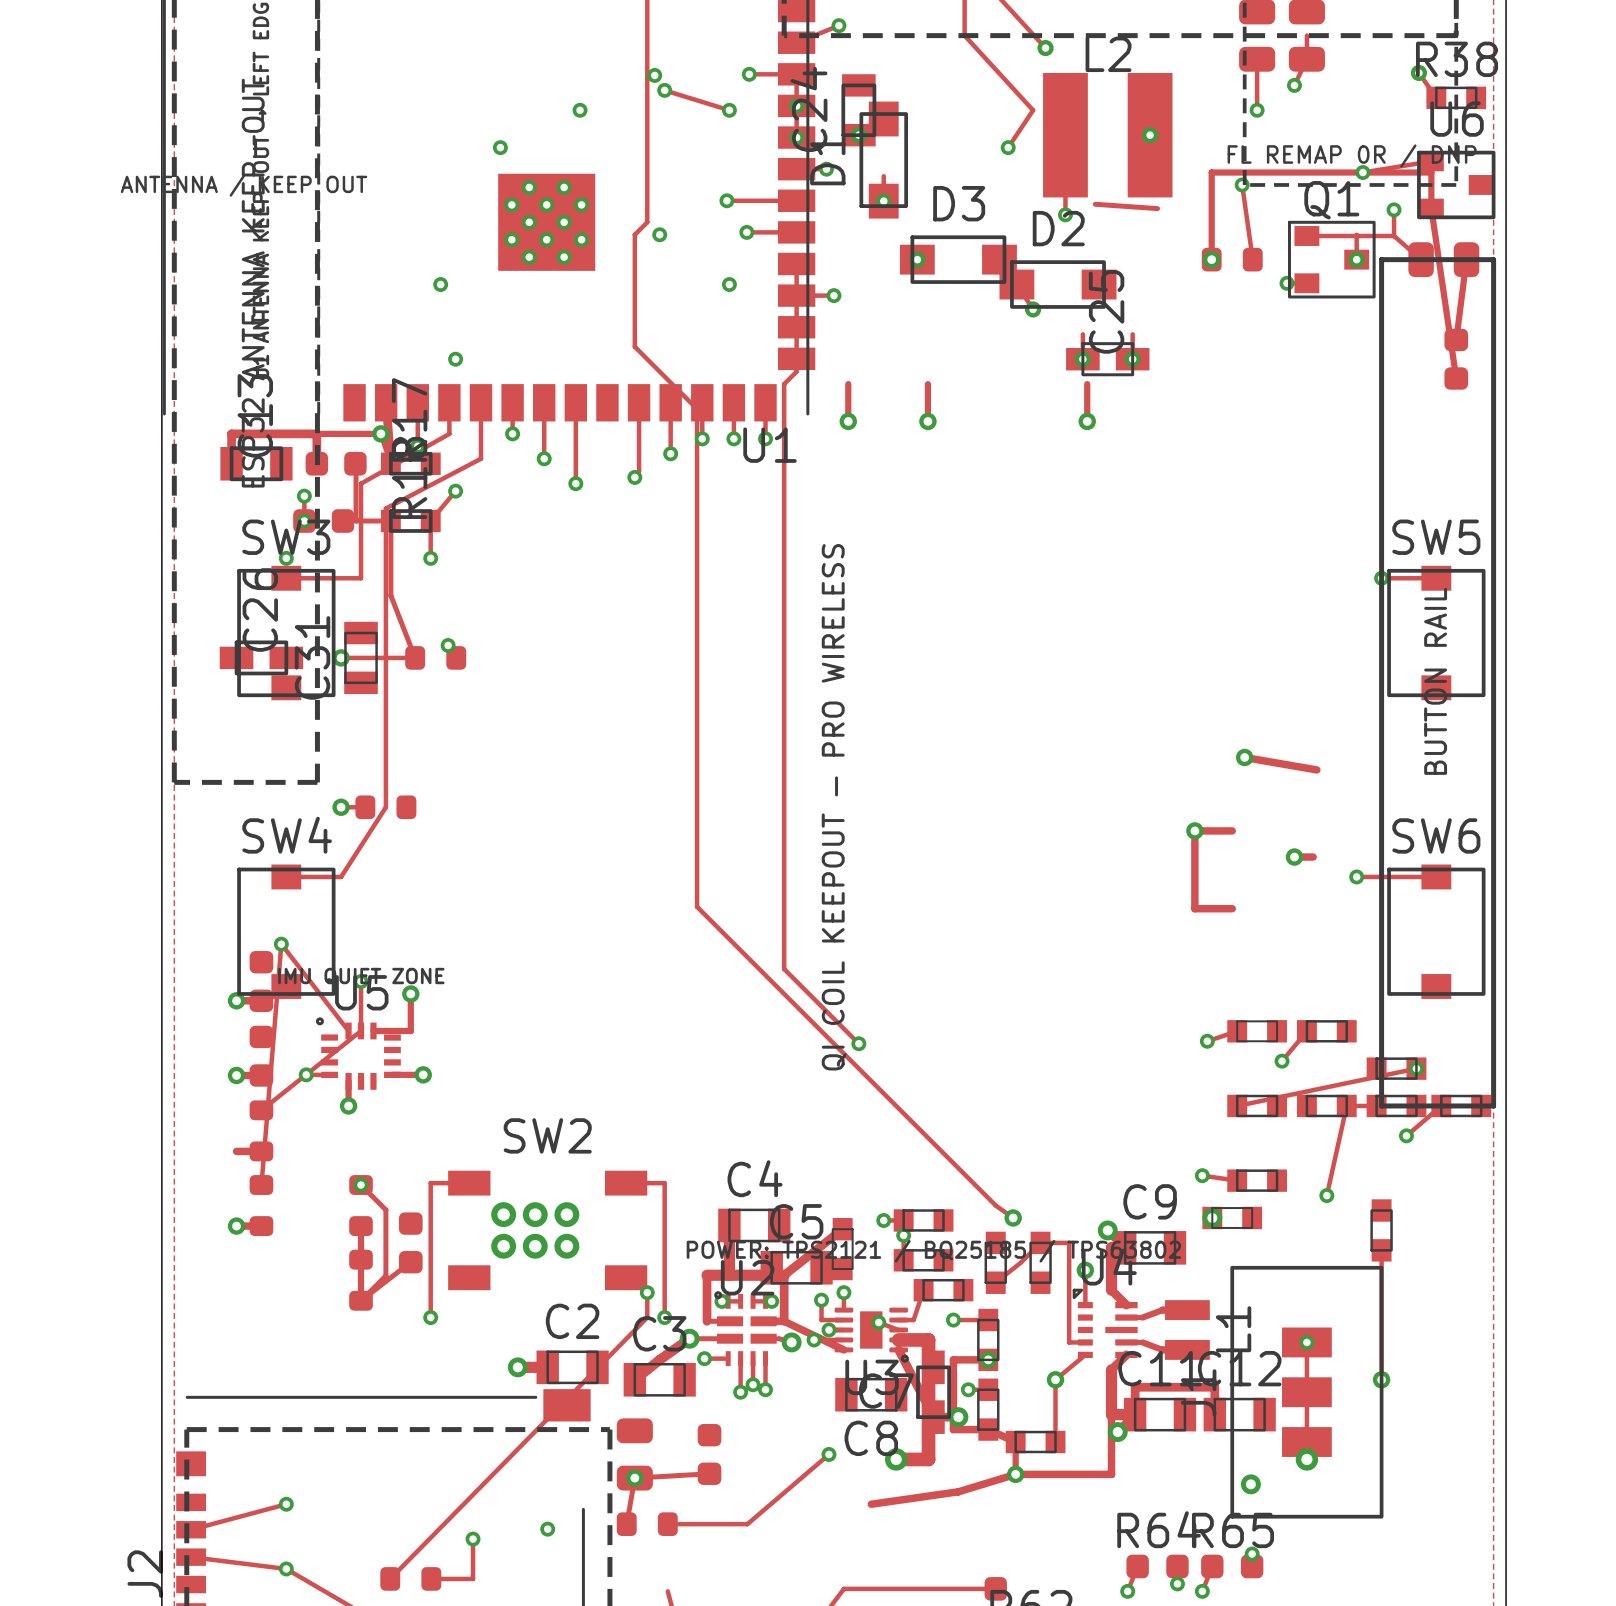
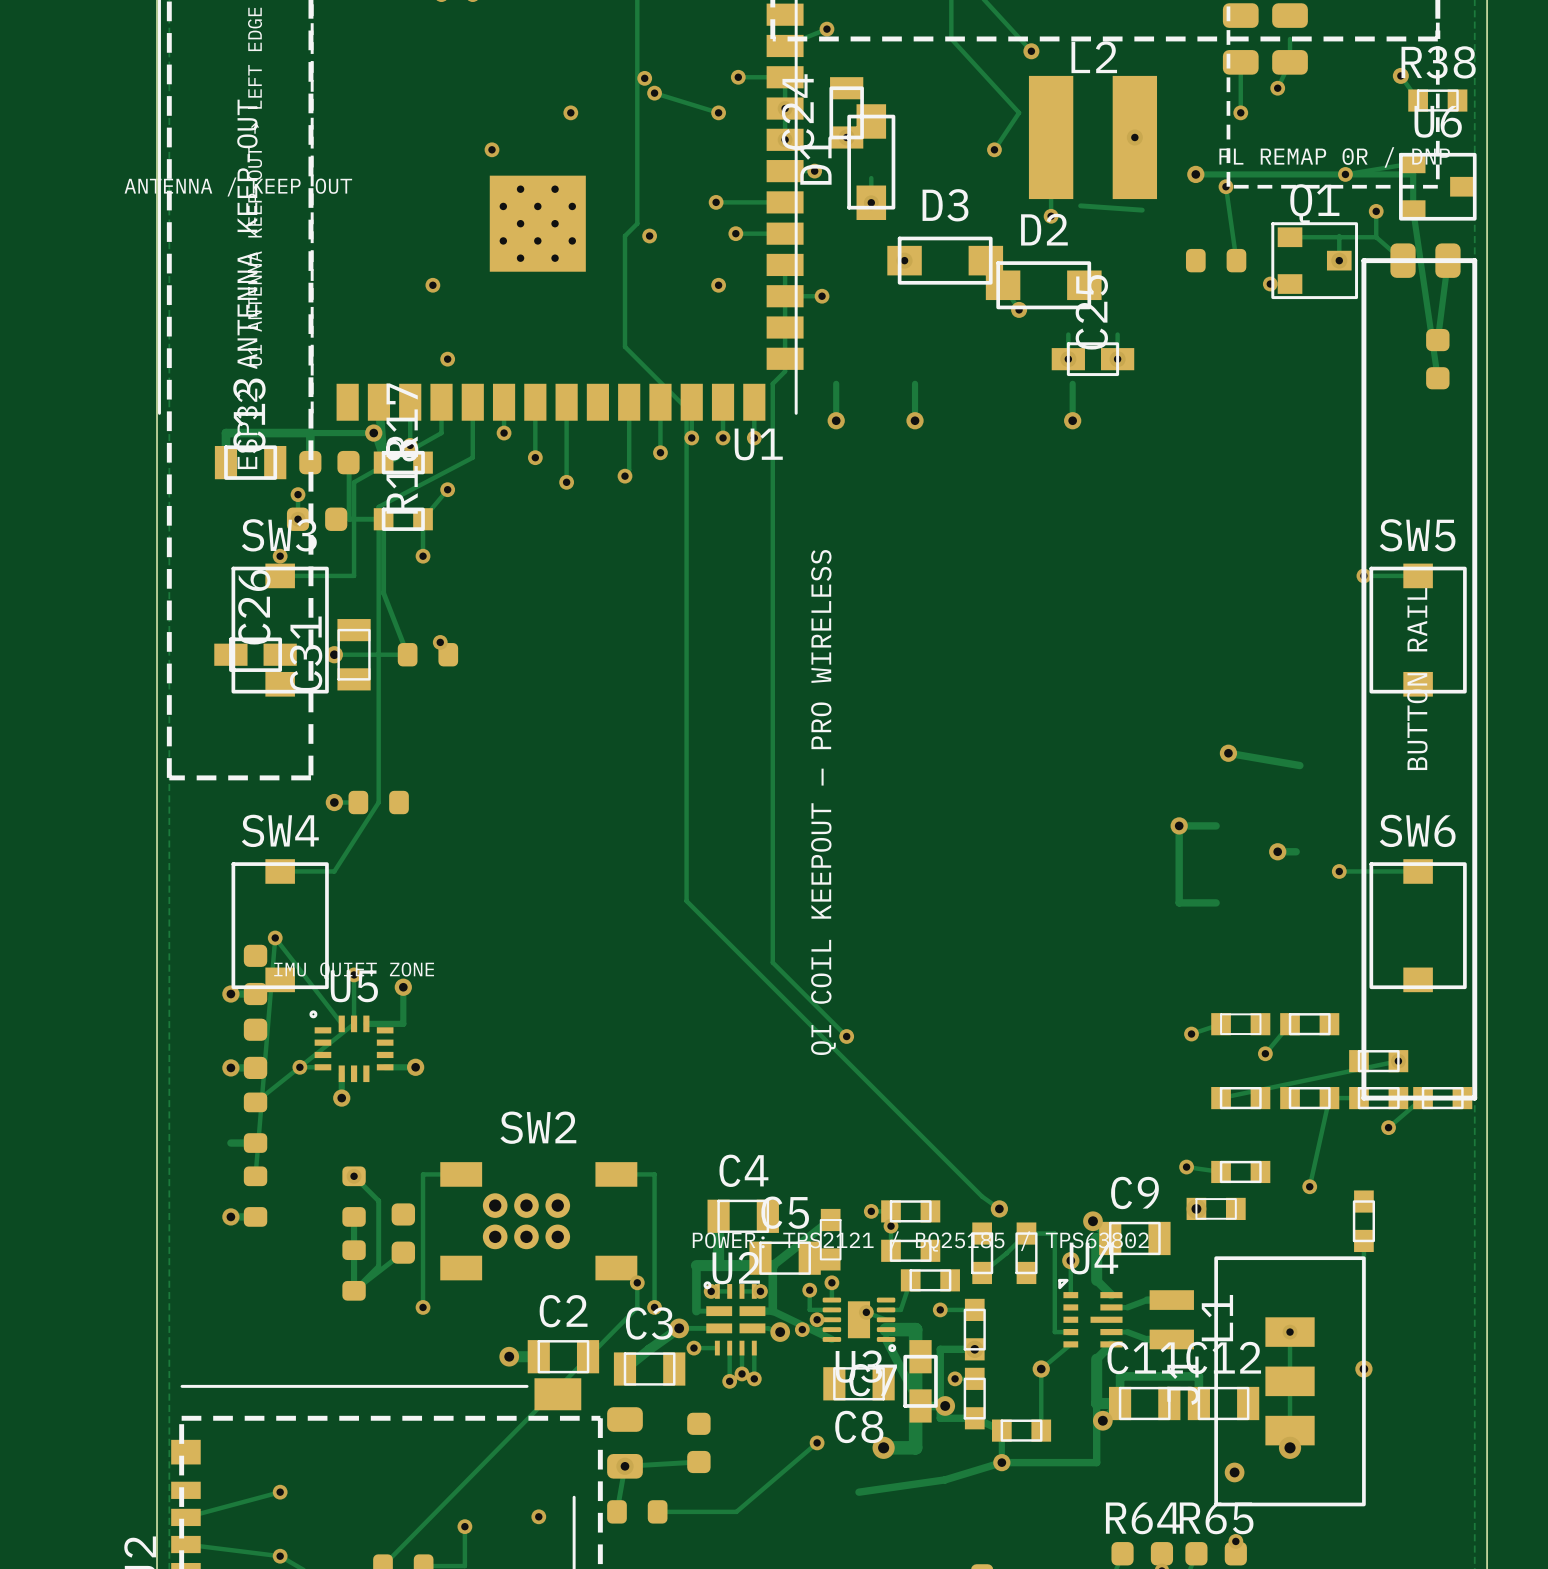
track: (1211, 172) (1211, 259) -> none
via position: (1211, 259) -> (1195, 174)

